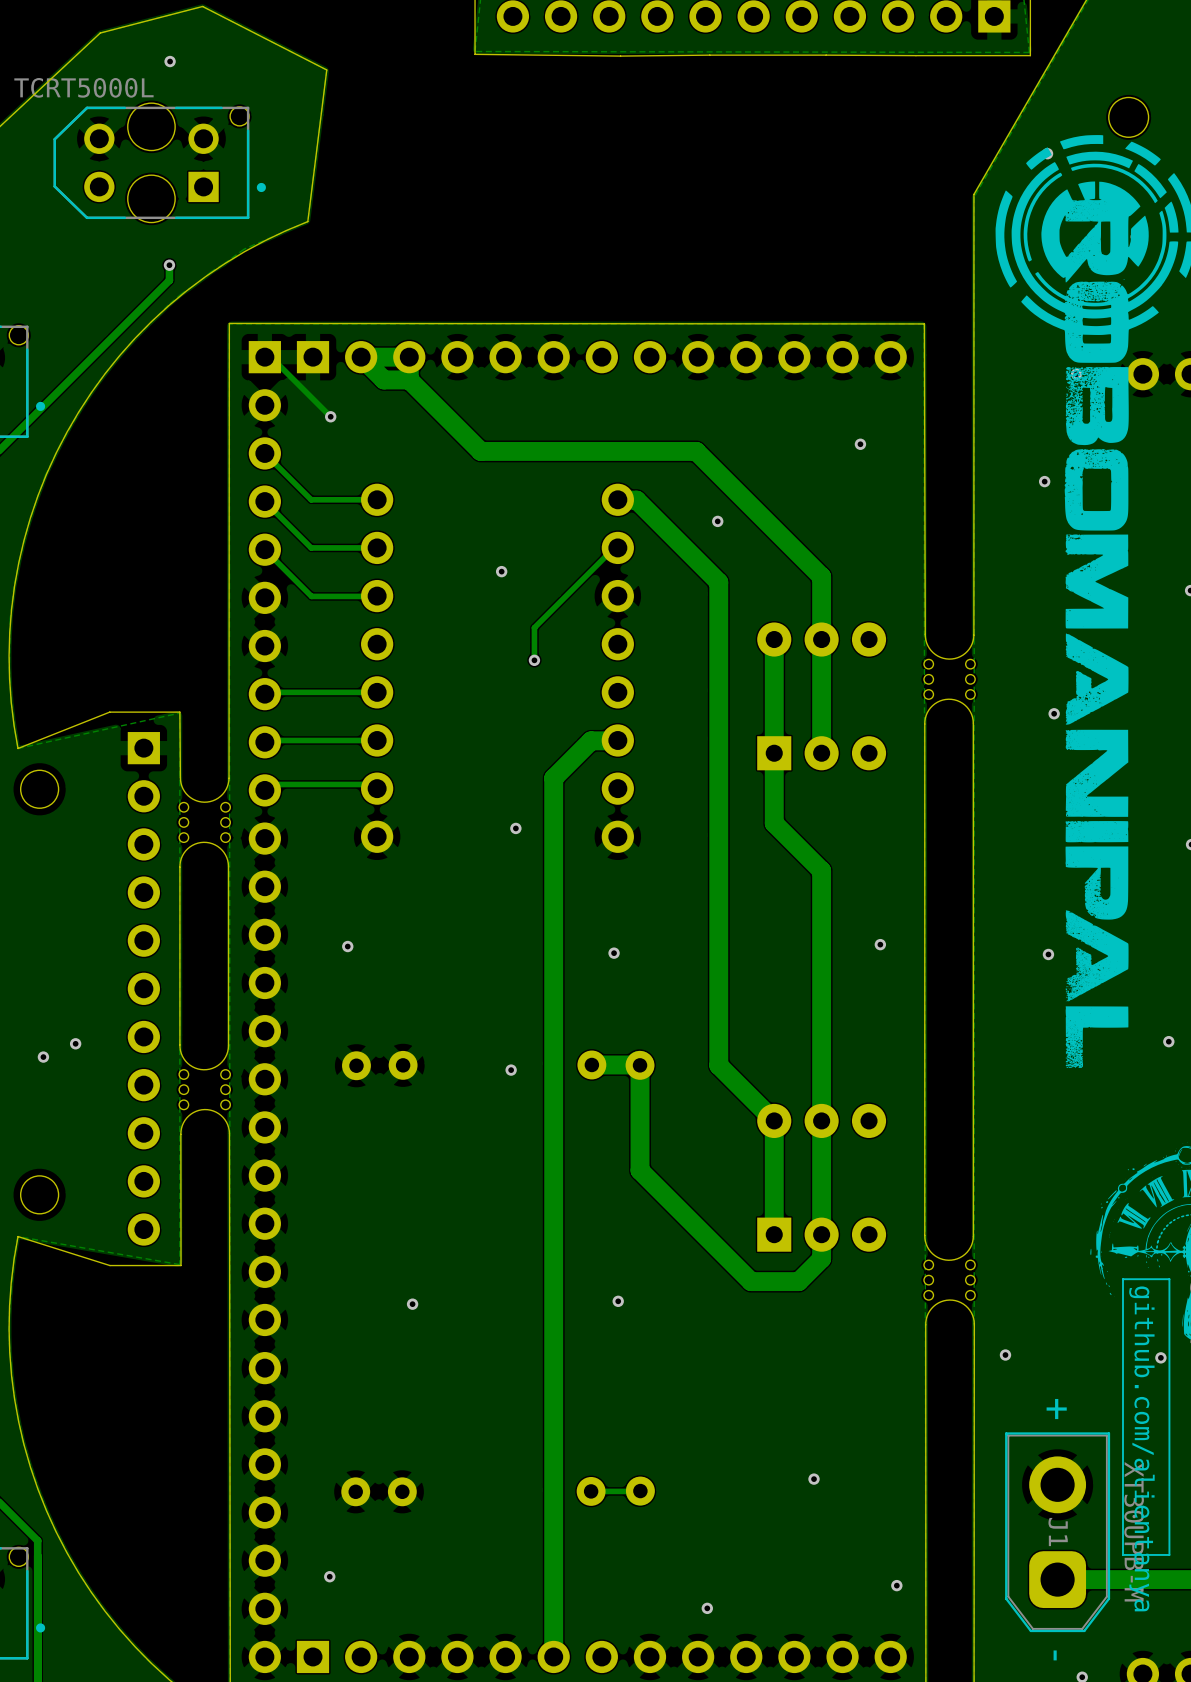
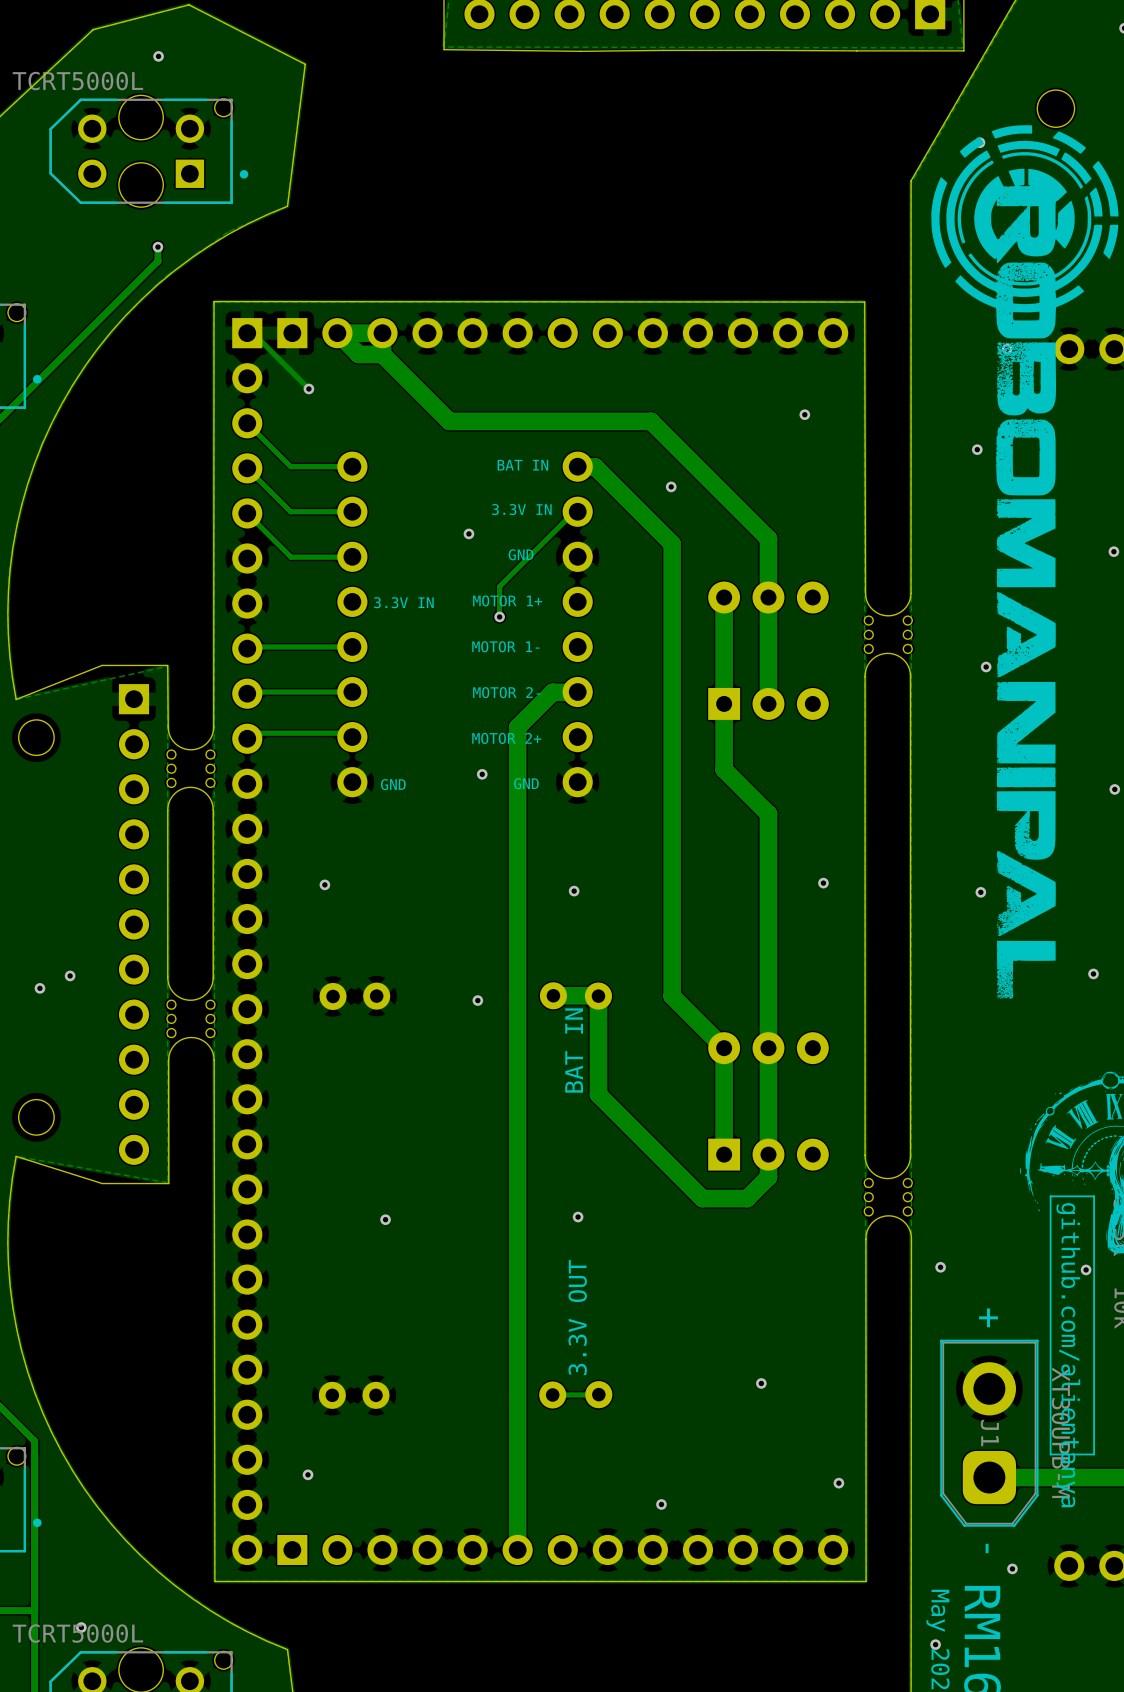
text: none -> BAT IN (522, 465)
text: none -> 3.3V IN (521, 509)
text: none -> GND (521, 554)
text: none -> MOTOR 1+ (507, 600)
text: none -> 3.3V IN (403, 602)
text: none -> MOTOR 1- (505, 646)
text: none -> MOTOR 2- (506, 692)
text: none -> MOTOR 2+ (506, 738)
text: none -> GND (526, 783)
text: none -> GND (393, 784)
text: none -> BAT IN (574, 1050)
text: none -> 3.3V OUT (577, 1317)

